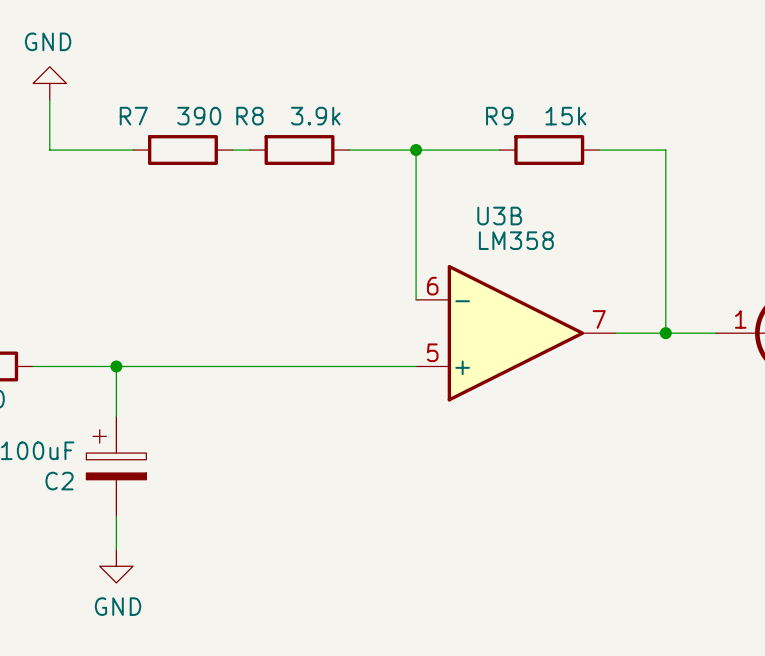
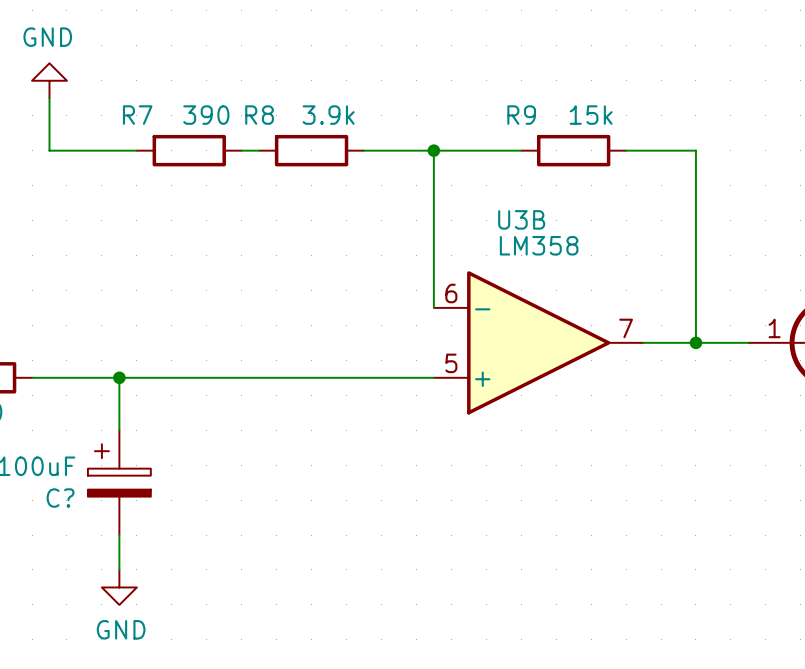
C2 name: C2 (59, 481) -> C? (60, 498)

